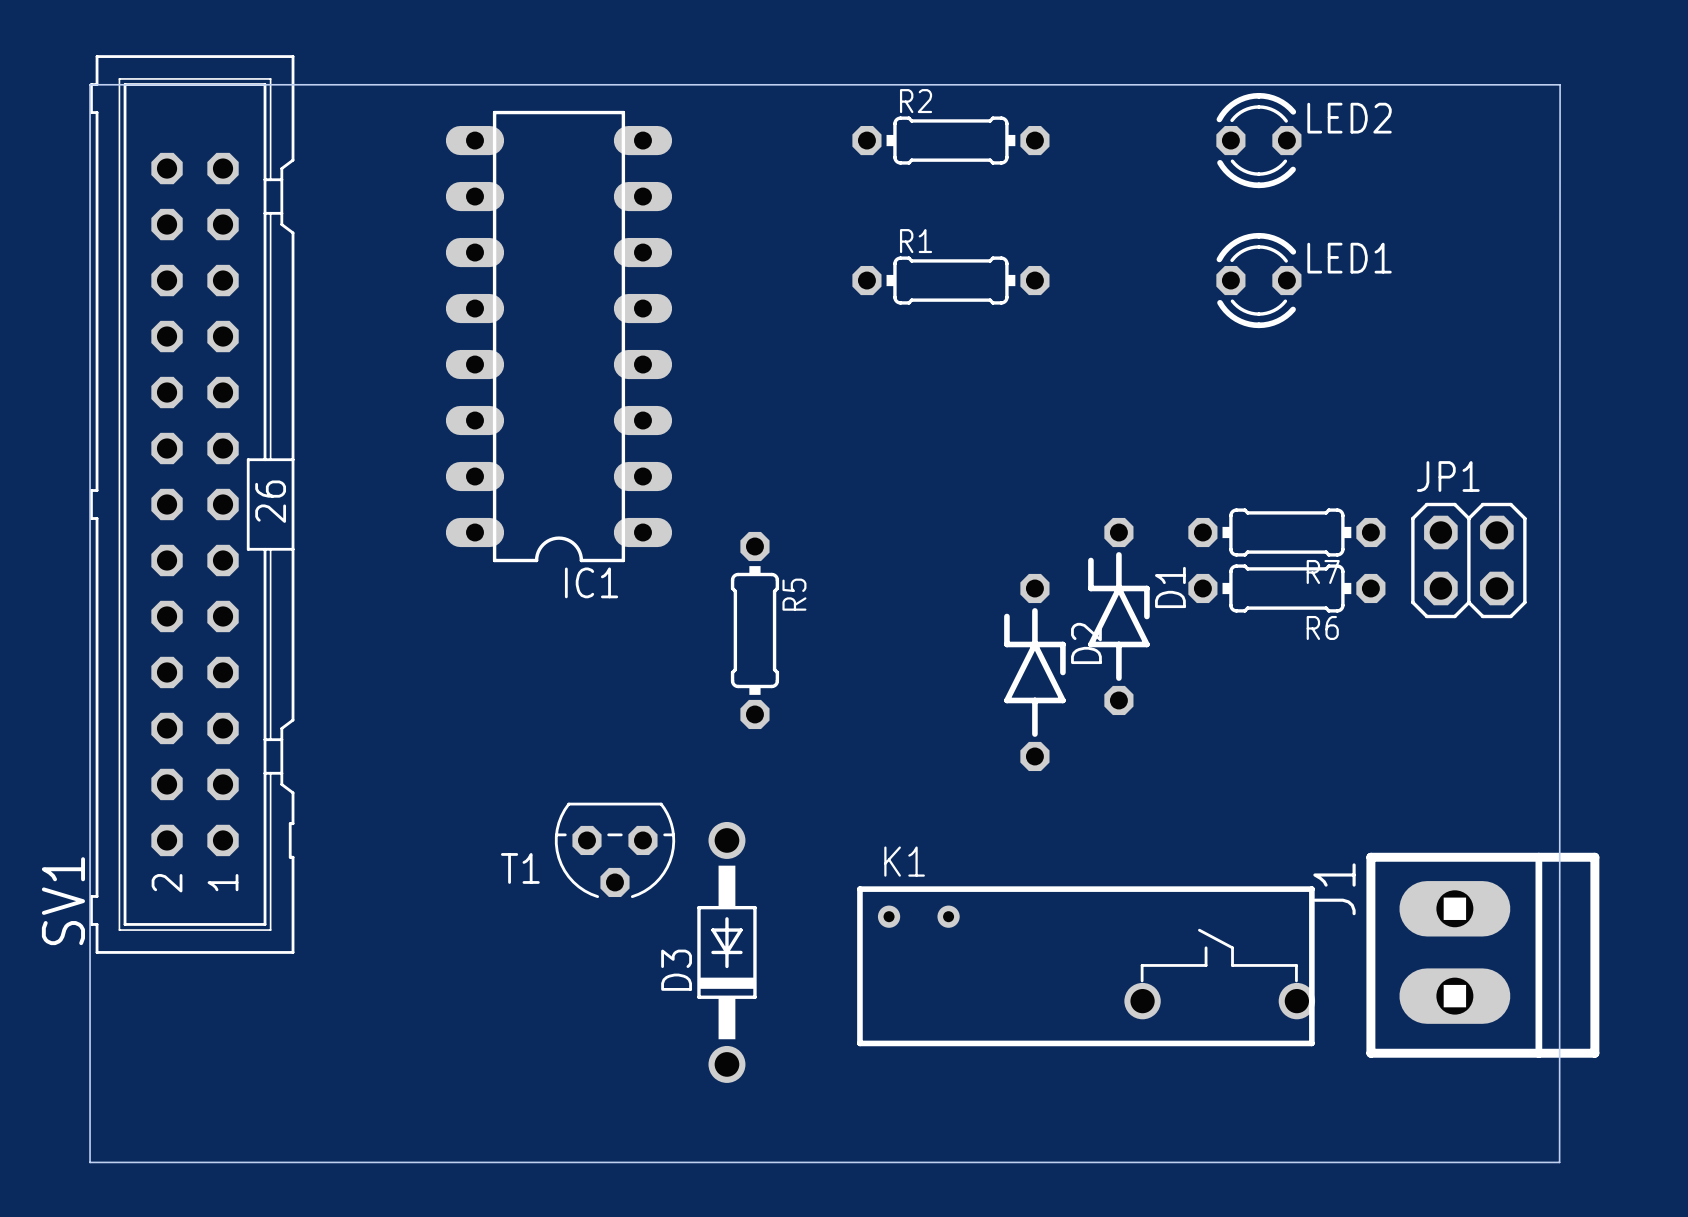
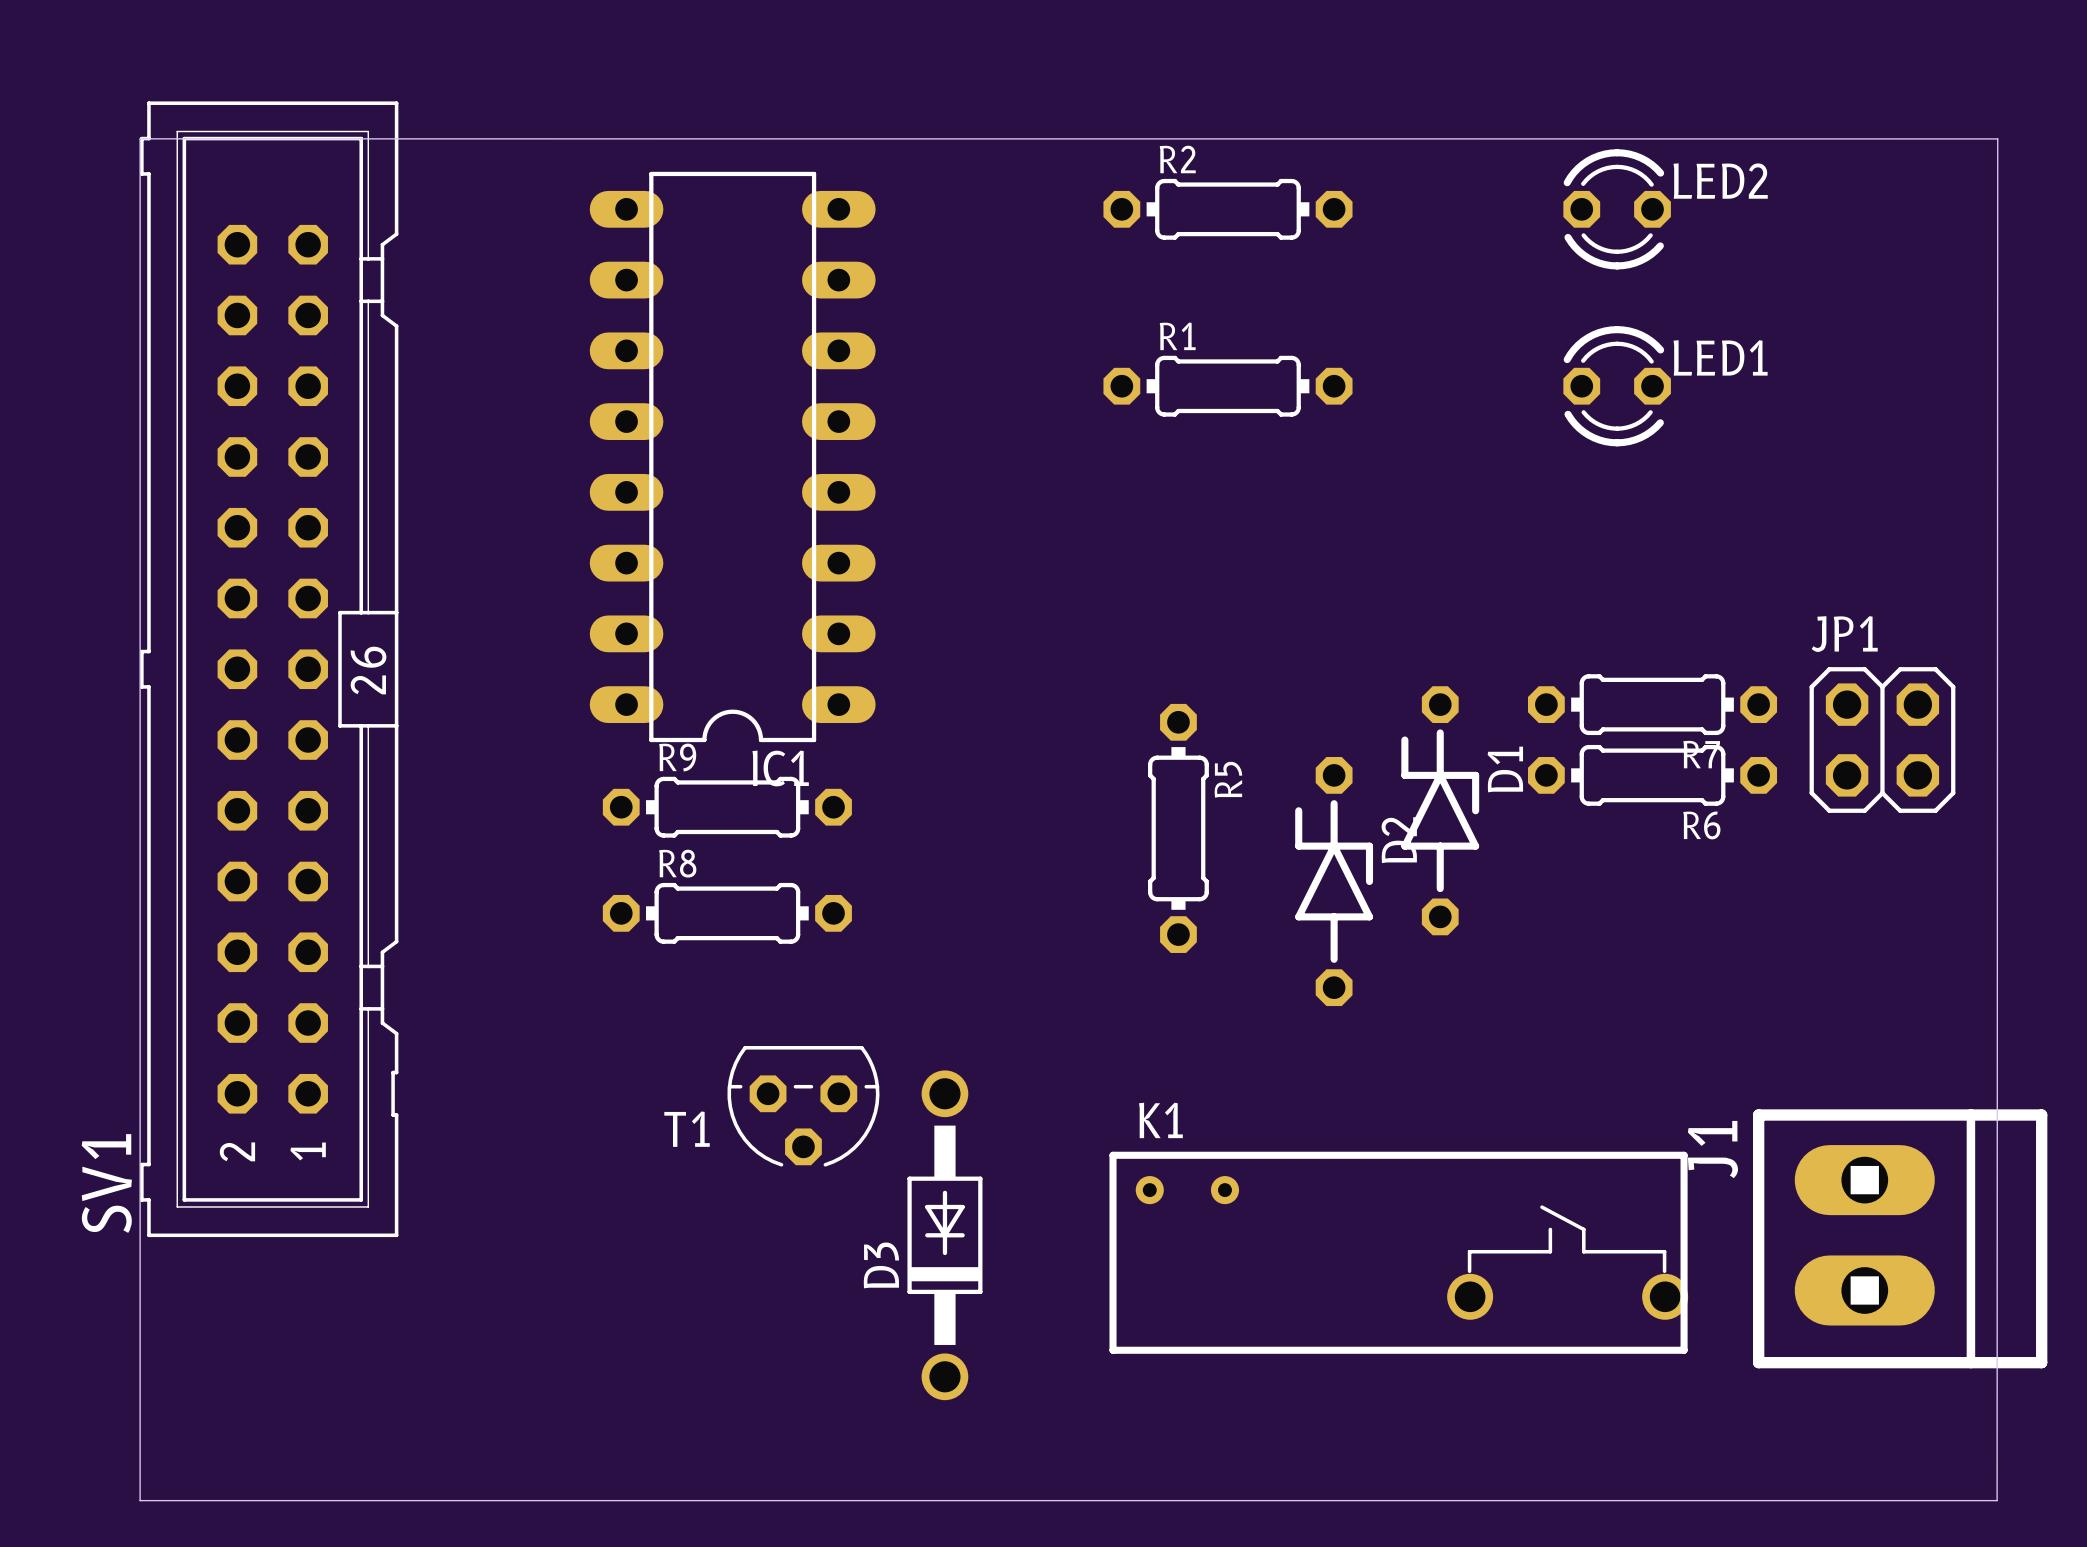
R9: none -> (727, 807)
R5 position: (754, 630) -> (1178, 828)
R8: none -> (727, 913)

